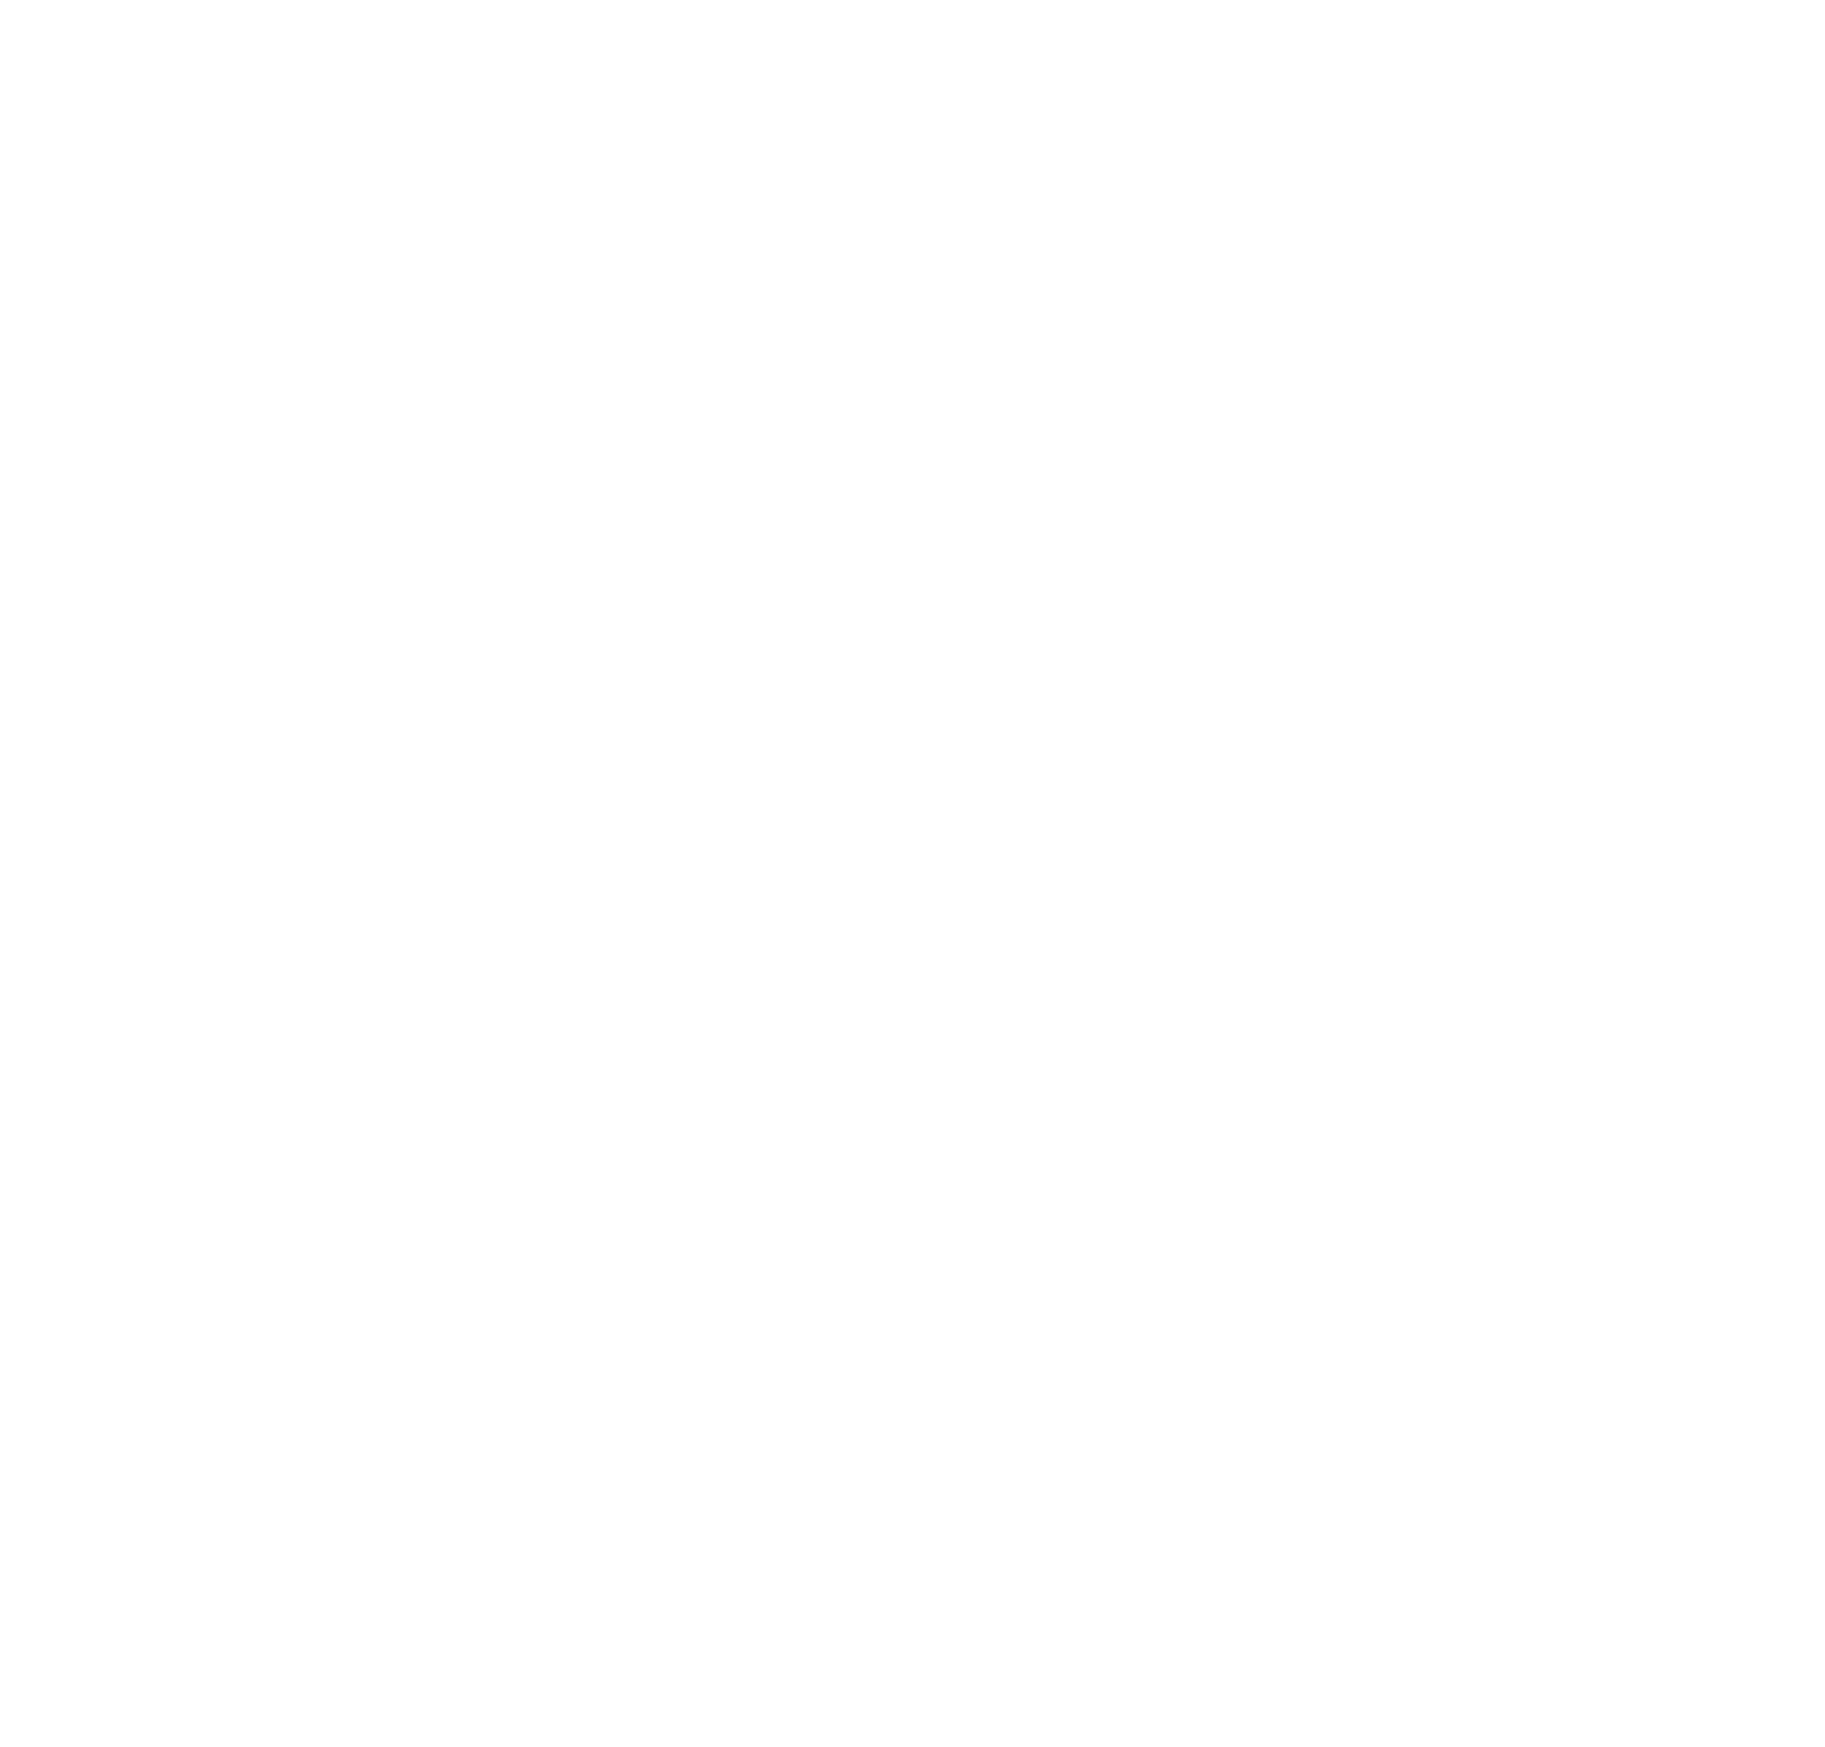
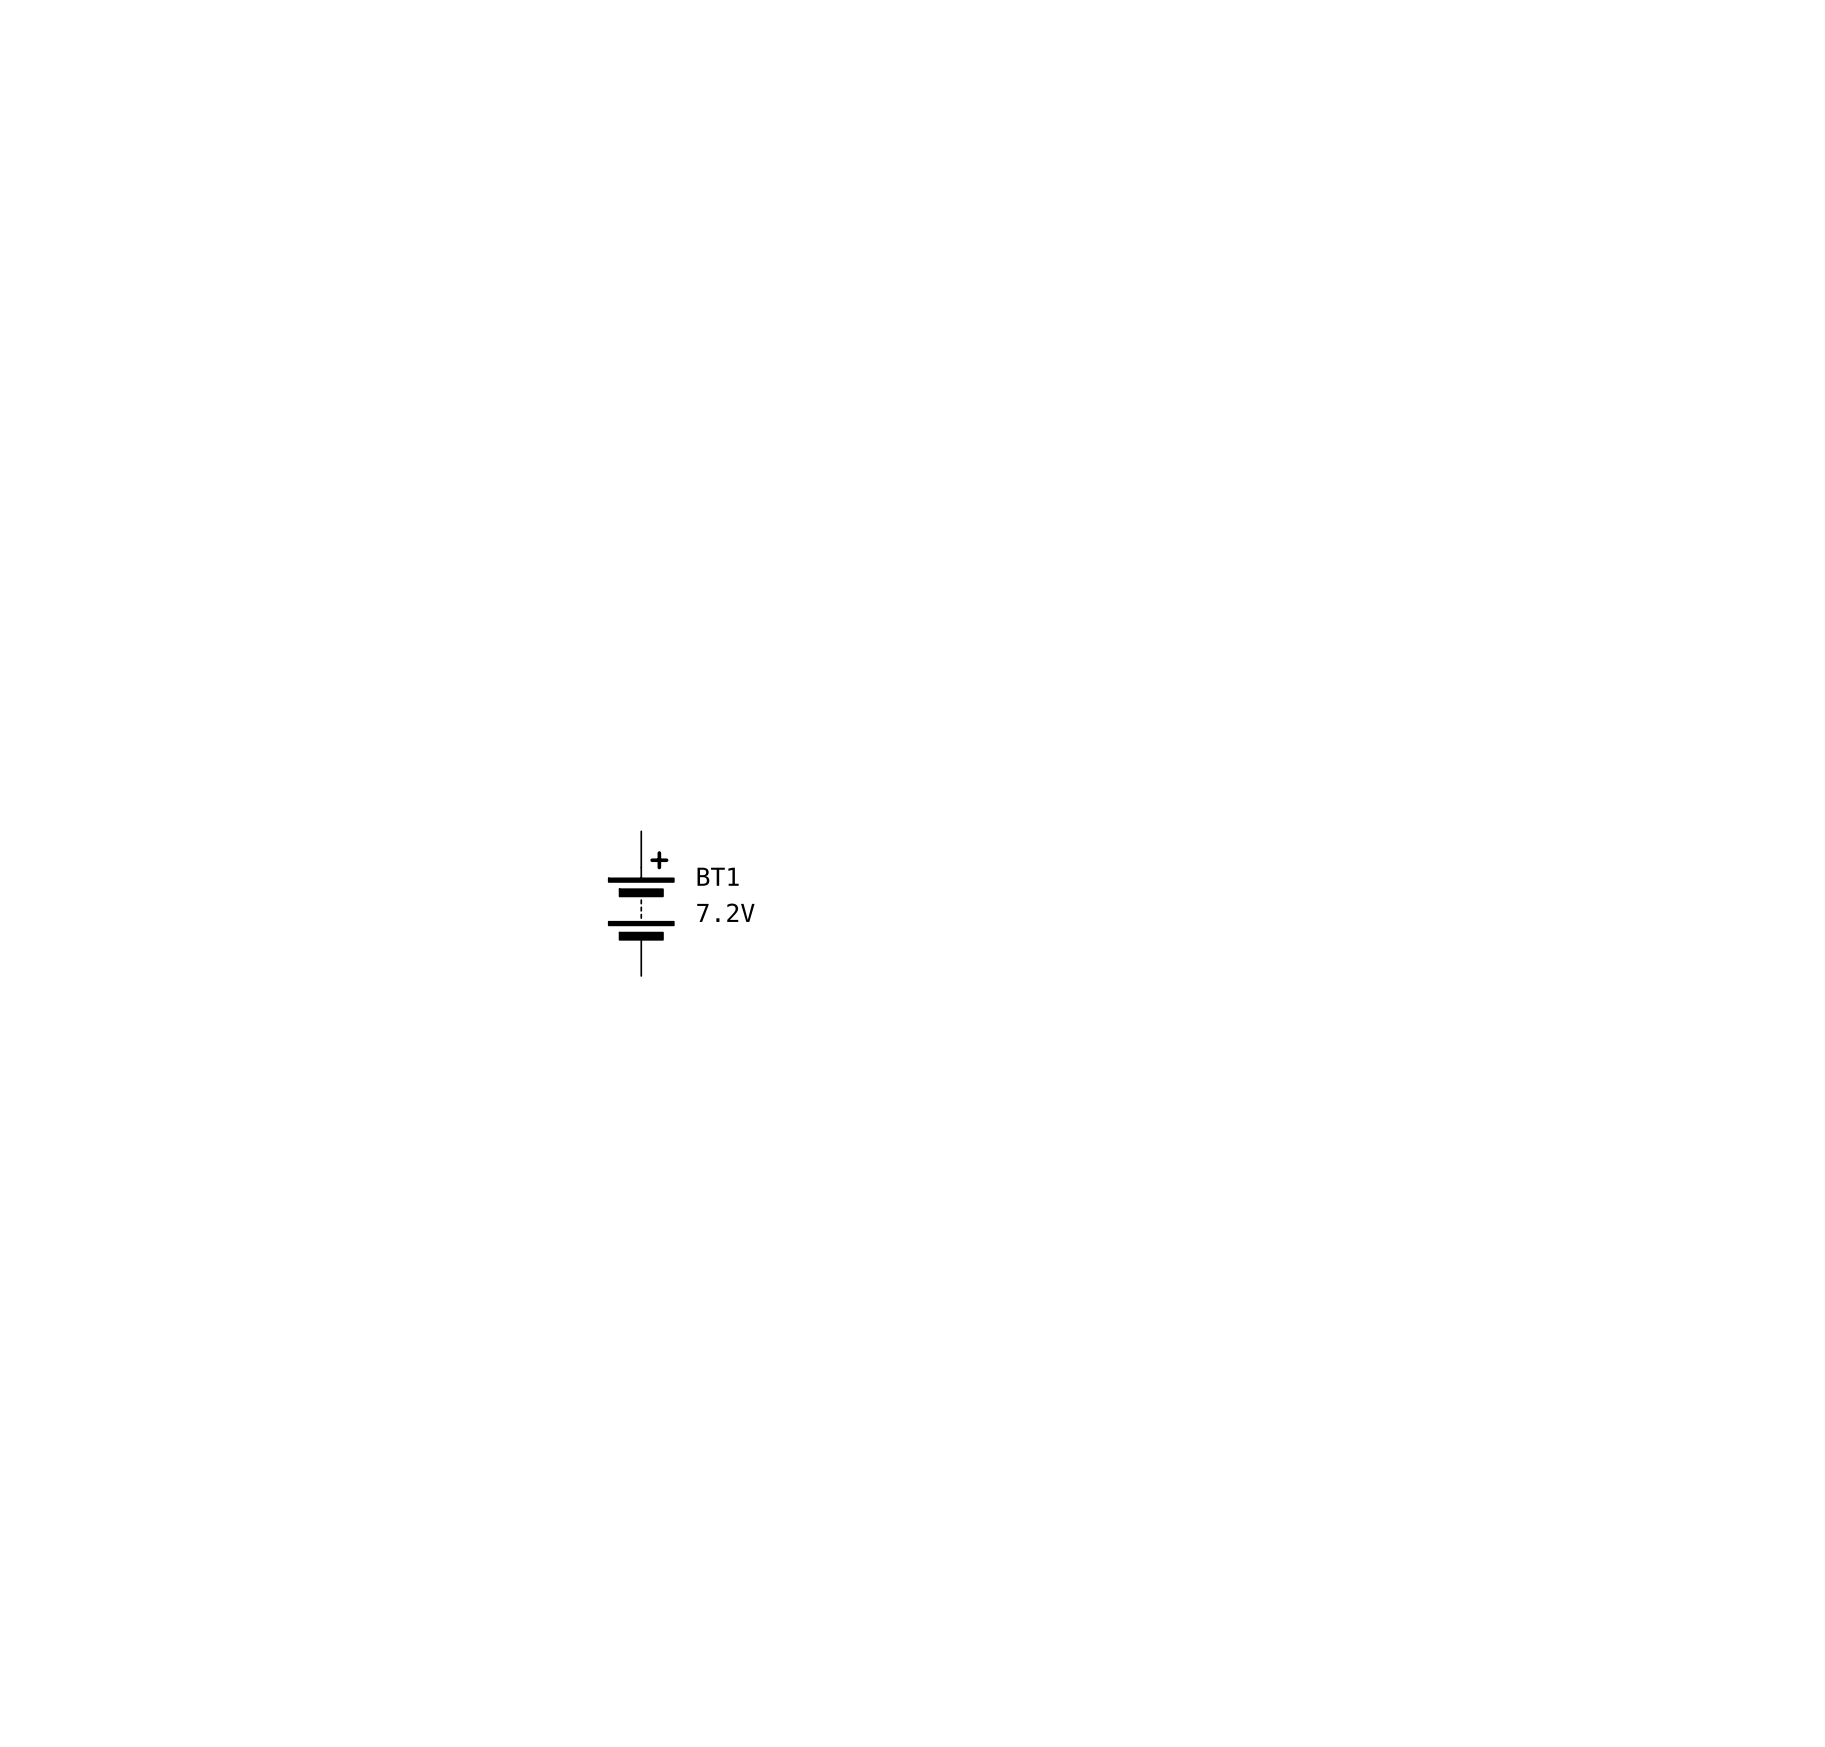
BT1: none -> 7.2V (641, 903)

